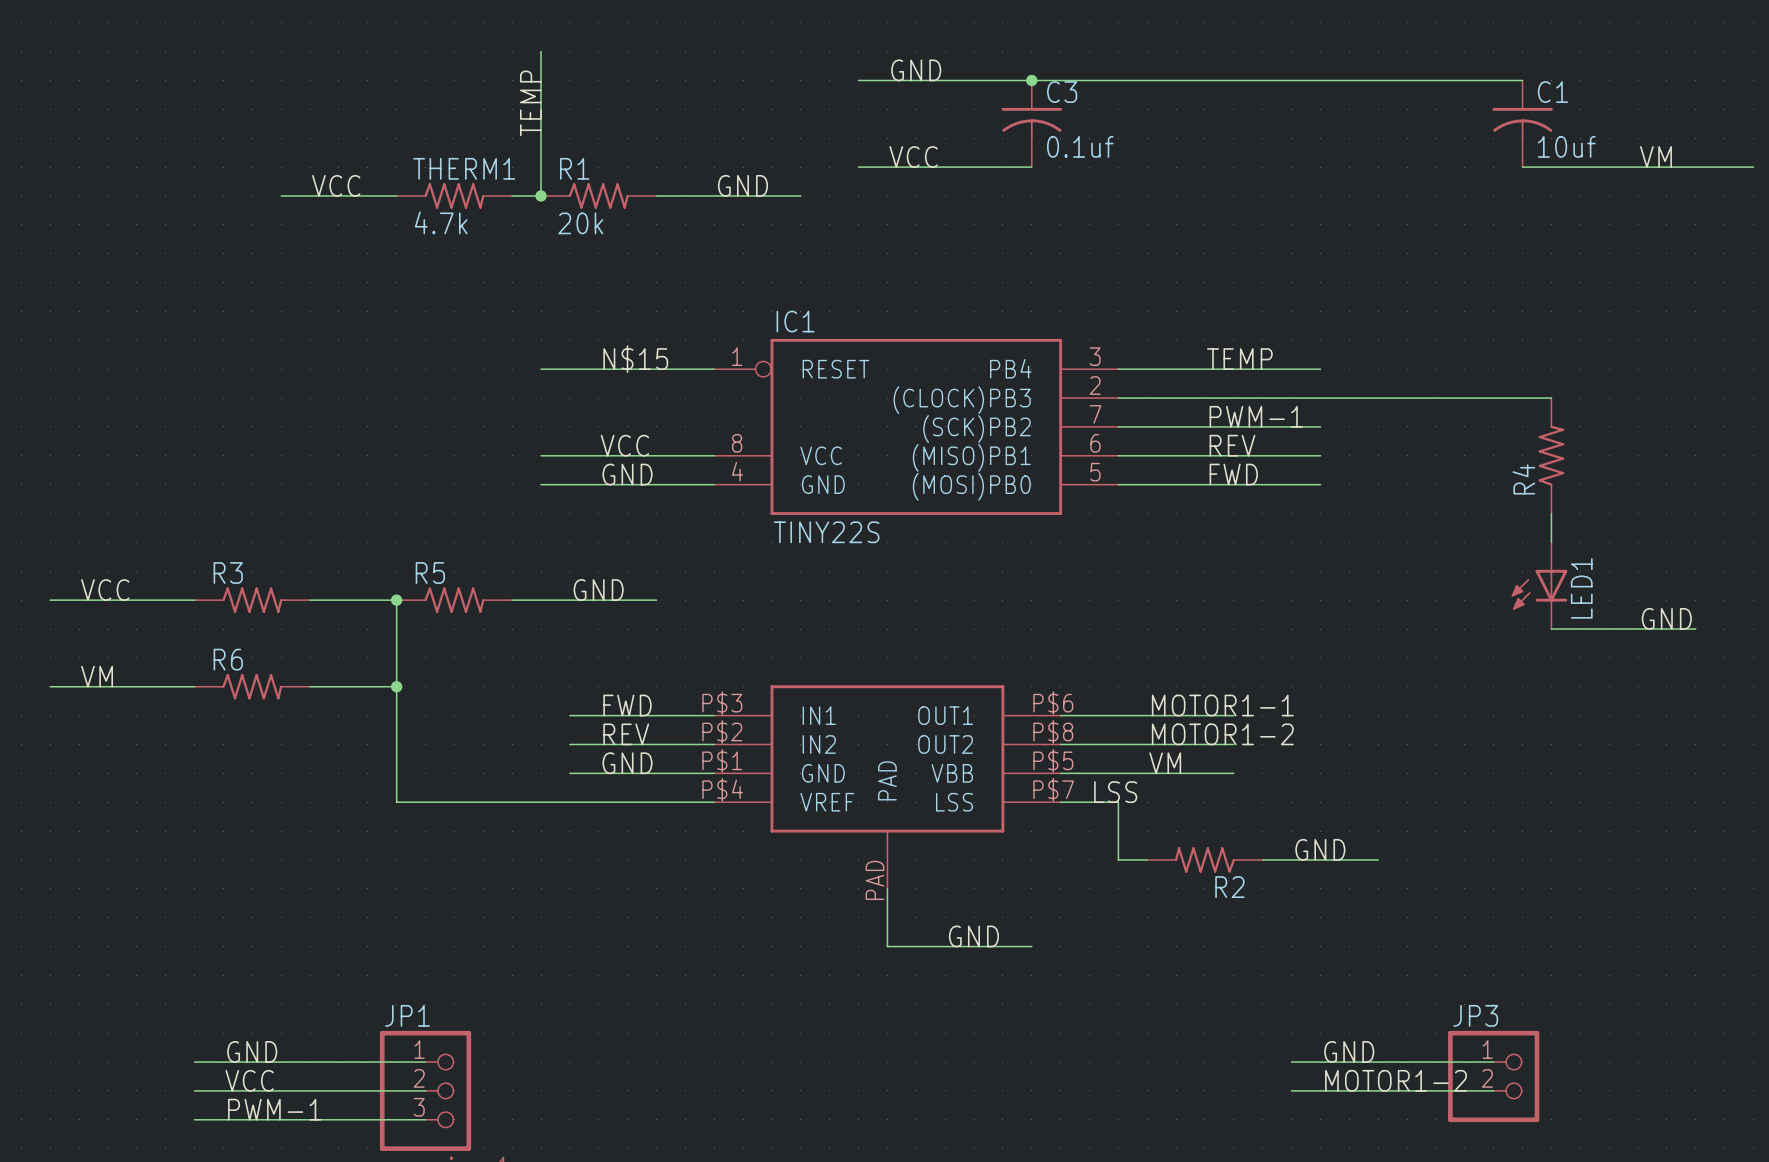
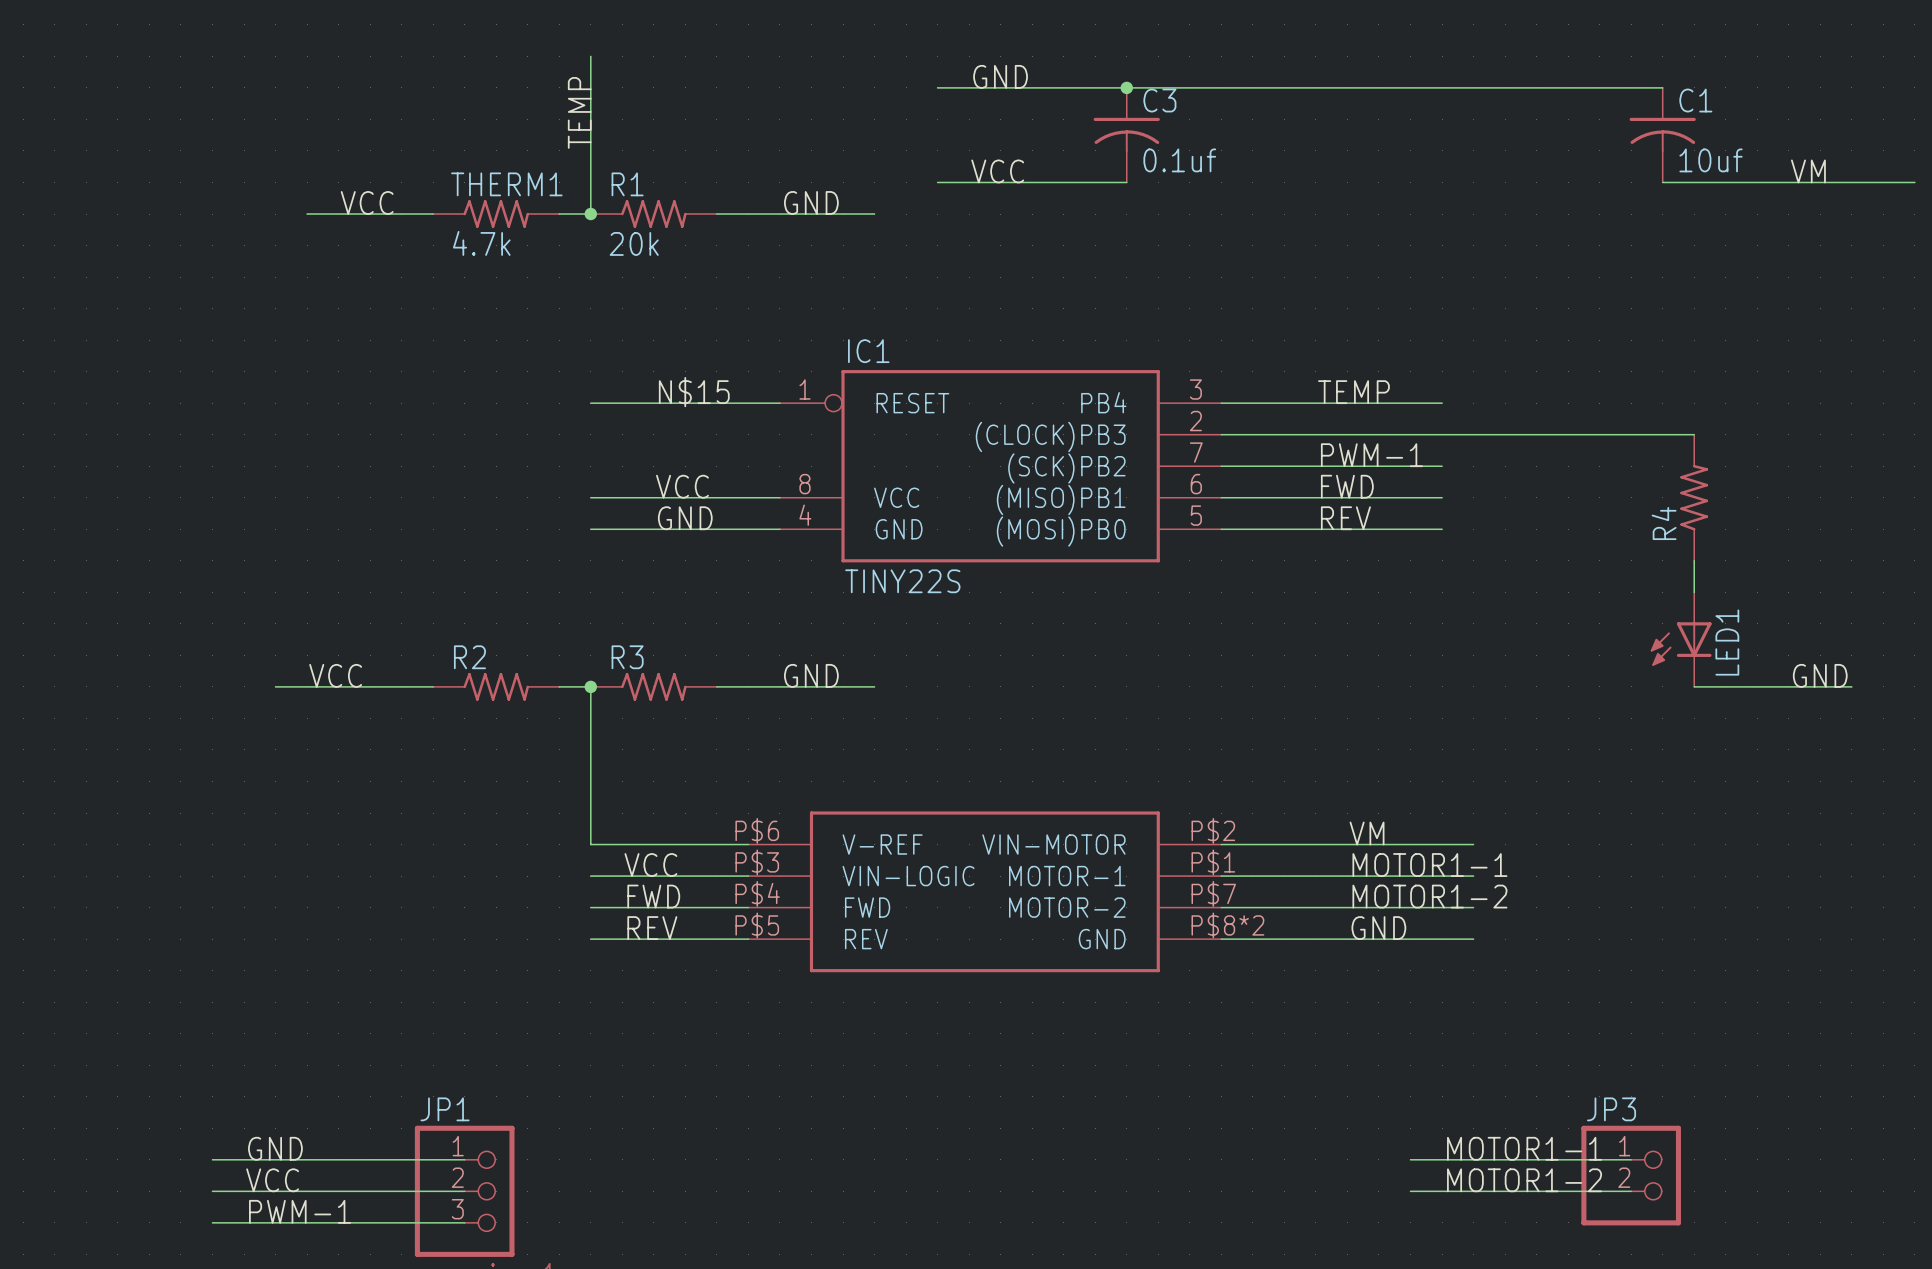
label: REV (1232, 445) -> FWD (1347, 486)
label: FWD (1233, 474) -> REV (1345, 518)
label position: VCC (105, 590) -> VCC (335, 675)
label: GND (598, 590) -> none
wire: (50, 600) (194, 600) -> (275, 686) (433, 686)
R3 position: (252, 600) -> (653, 686)
wire: (310, 600) (396, 600) (396, 802) (541, 802) -> none
junction: (396, 600) -> none
R5: (454, 600) -> none
wire: (512, 600) (656, 600) -> (716, 686) (874, 686)
label: none -> GND (811, 675)
wire: none -> (559, 686) (590, 686) (590, 844) (622, 844)
junction: none -> (590, 686)
label: VM (97, 676) -> none
wire: (50, 686) (194, 686) -> none
R6: (252, 686) -> none
wire: (310, 686) (396, 686) -> none
junction: (396, 686) -> none
label position: FWD (627, 705) -> FWD (653, 896)
label position: MOTOR1-1 (1222, 705) -> MOTOR1-1 (1429, 865)
wire: (569, 715) (714, 715) -> (590, 907) (748, 907)
wire: (1060, 715) (1233, 715) -> none
label position: REV (626, 734) -> REV (652, 928)
label position: MOTOR1-2 (1222, 734) -> MOTOR1-2 (1429, 896)
wire: (569, 744) (714, 744) -> (590, 939) (748, 939)
wire: (1060, 744) (1233, 744) -> none
label: GND (627, 763) -> none
label position: VM (1165, 763) -> VM (1367, 833)
wire: none -> (1347, 844) (1473, 844)
part: (887, 787) -> none
label: none -> VCC (650, 865)
label: LSS (1115, 792) -> none
wire: (1060, 802) (1118, 802) (1118, 859) -> none
wire: none -> (1221, 876) (1473, 876)
part: none -> (984, 891)
wire: none -> (1221, 907) (1473, 907)
label position: GND (1320, 849) -> GND (1378, 928)
R2 rotation: 0° (1204, 859) -> 180° (496, 686)
R2 position: (1204, 859) -> (496, 686)
wire: (1349, 859) (1378, 859) -> none
wire: (887, 888) (887, 946) (1031, 946) -> none
label: GND (973, 936) -> none
label: GND (1349, 1051) -> MOTOR1-1 (1524, 1148)

